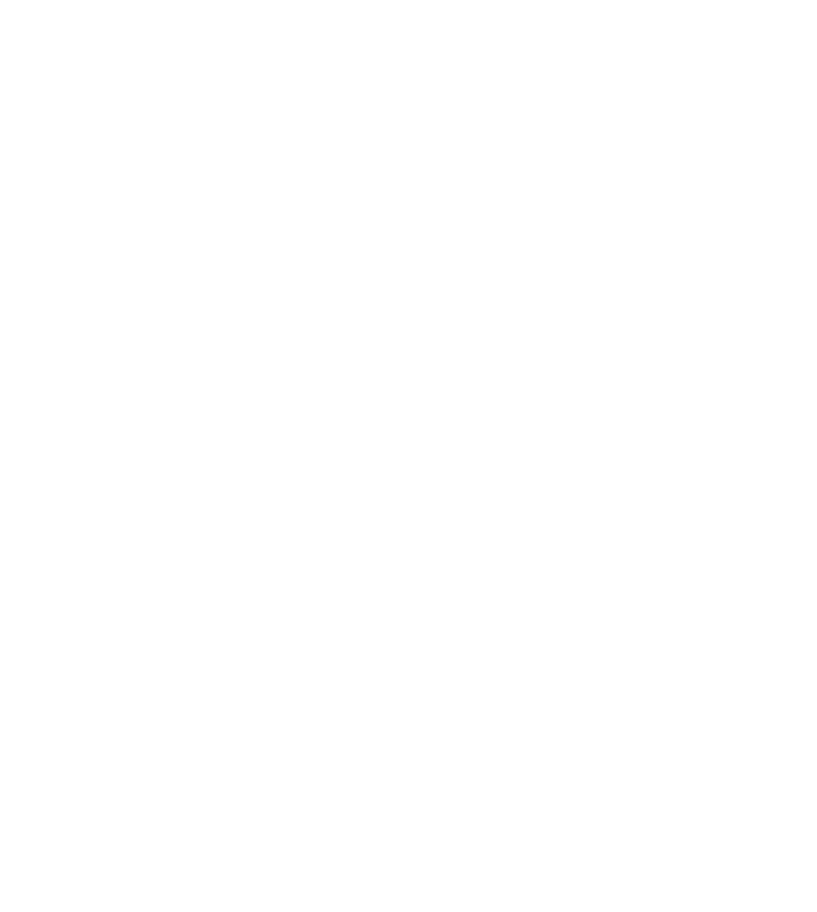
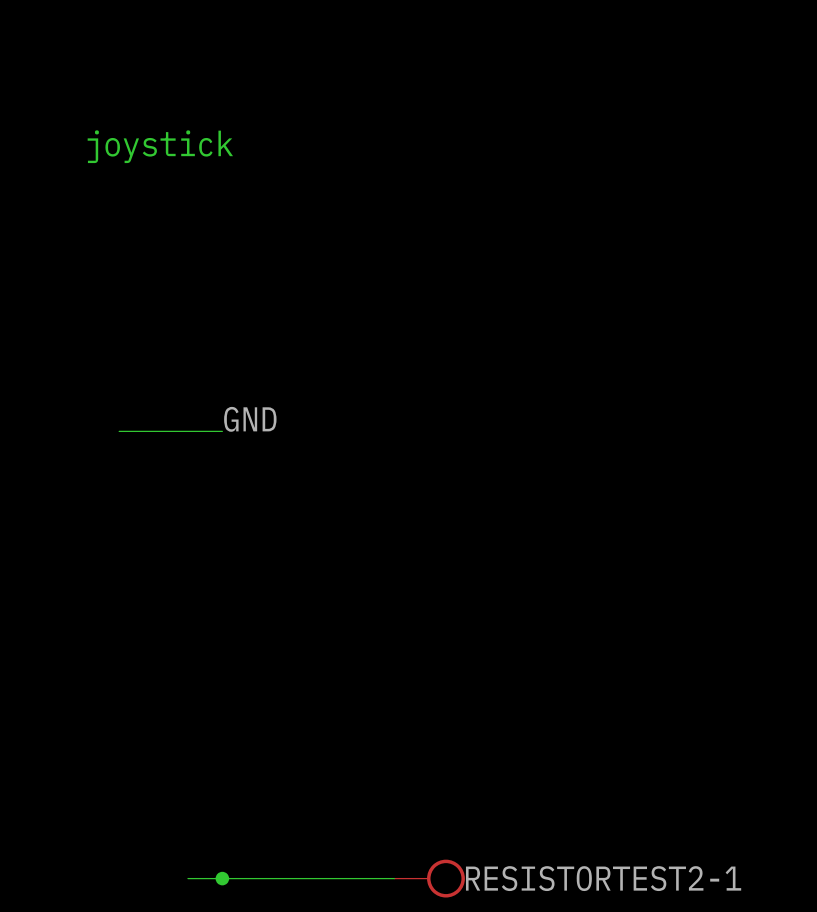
text: none -> joystick (160, 146)
label: none -> GND (250, 419)
wire: none -> (119, 431) (222, 431)
wire: none -> (187, 878) (394, 878)
junction: none -> (222, 878)
RESISTORTEST2-1: none -> (429, 878)

